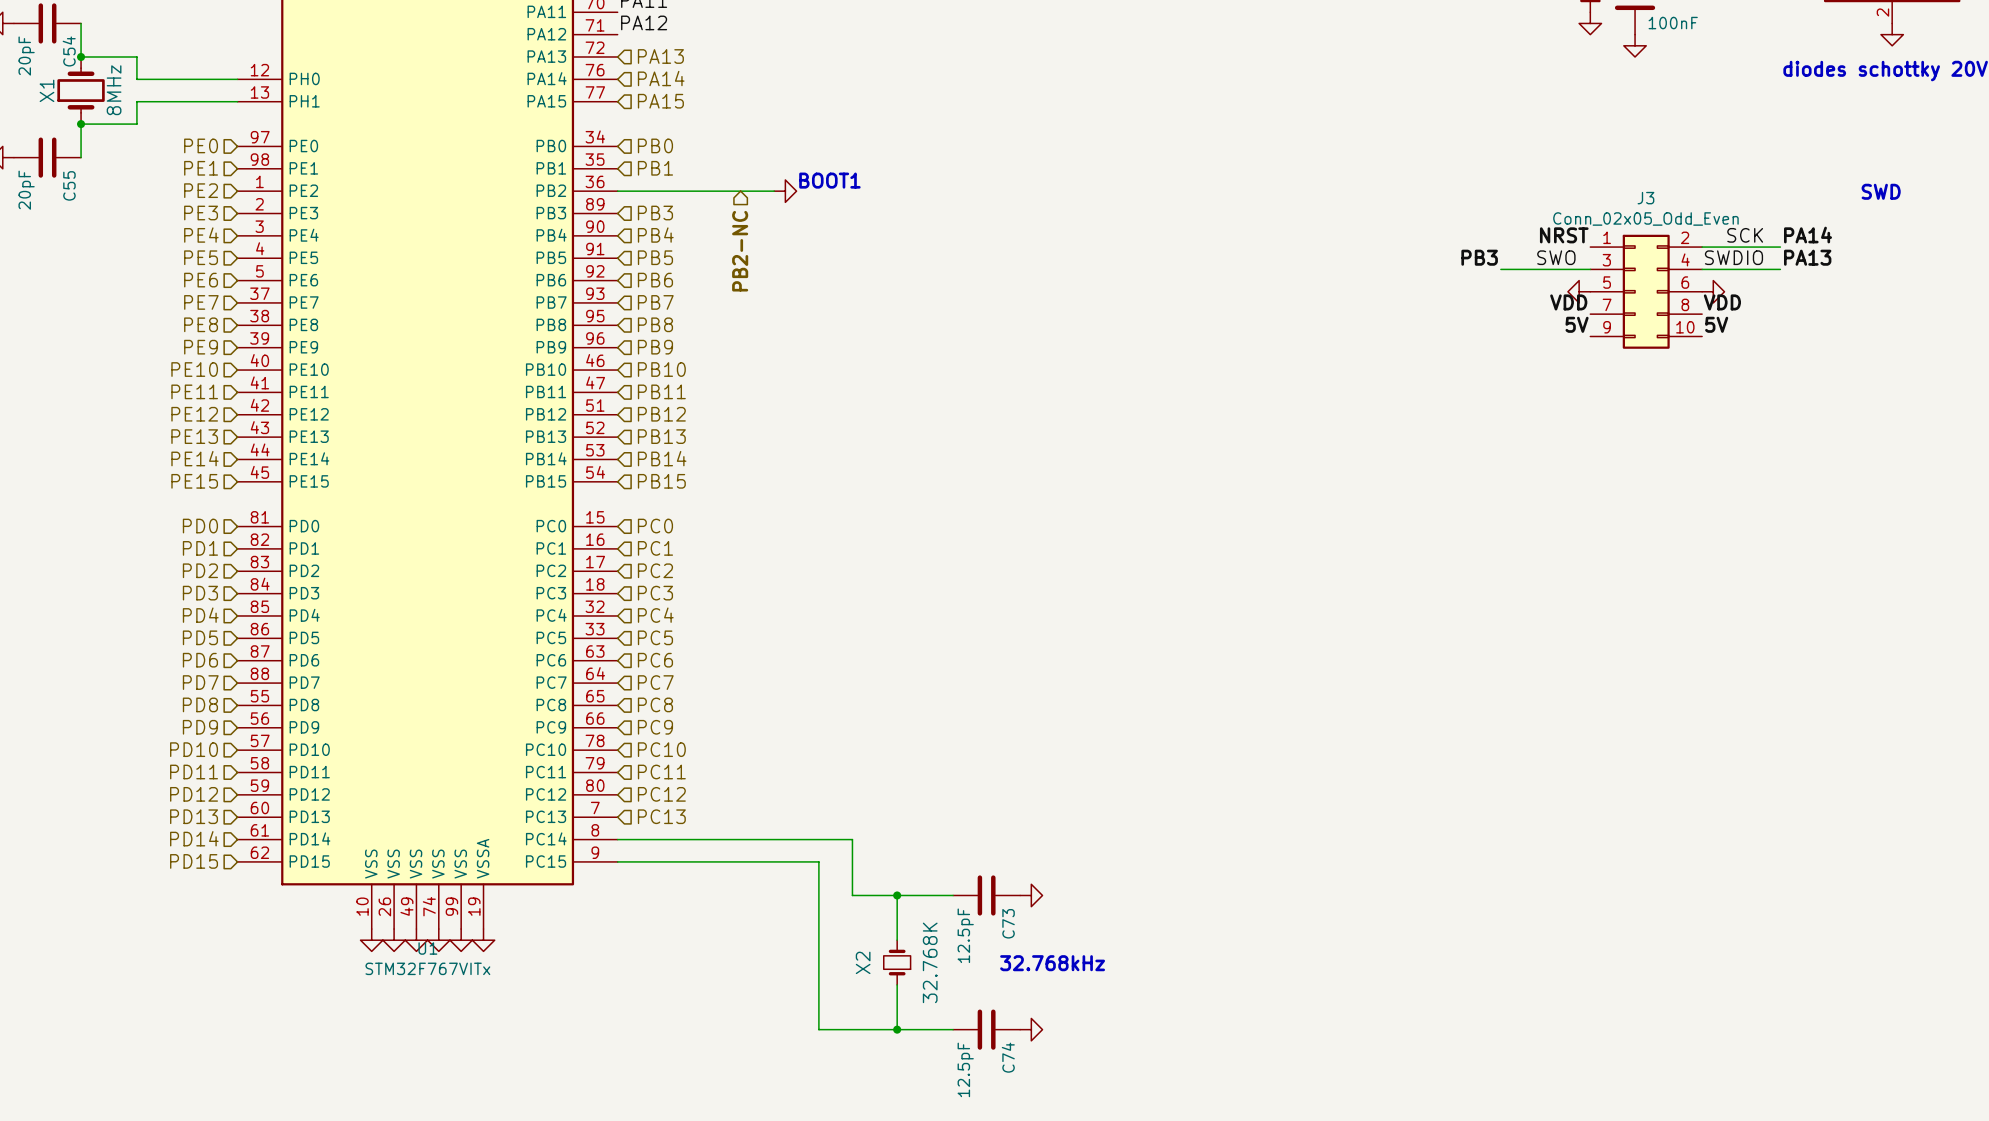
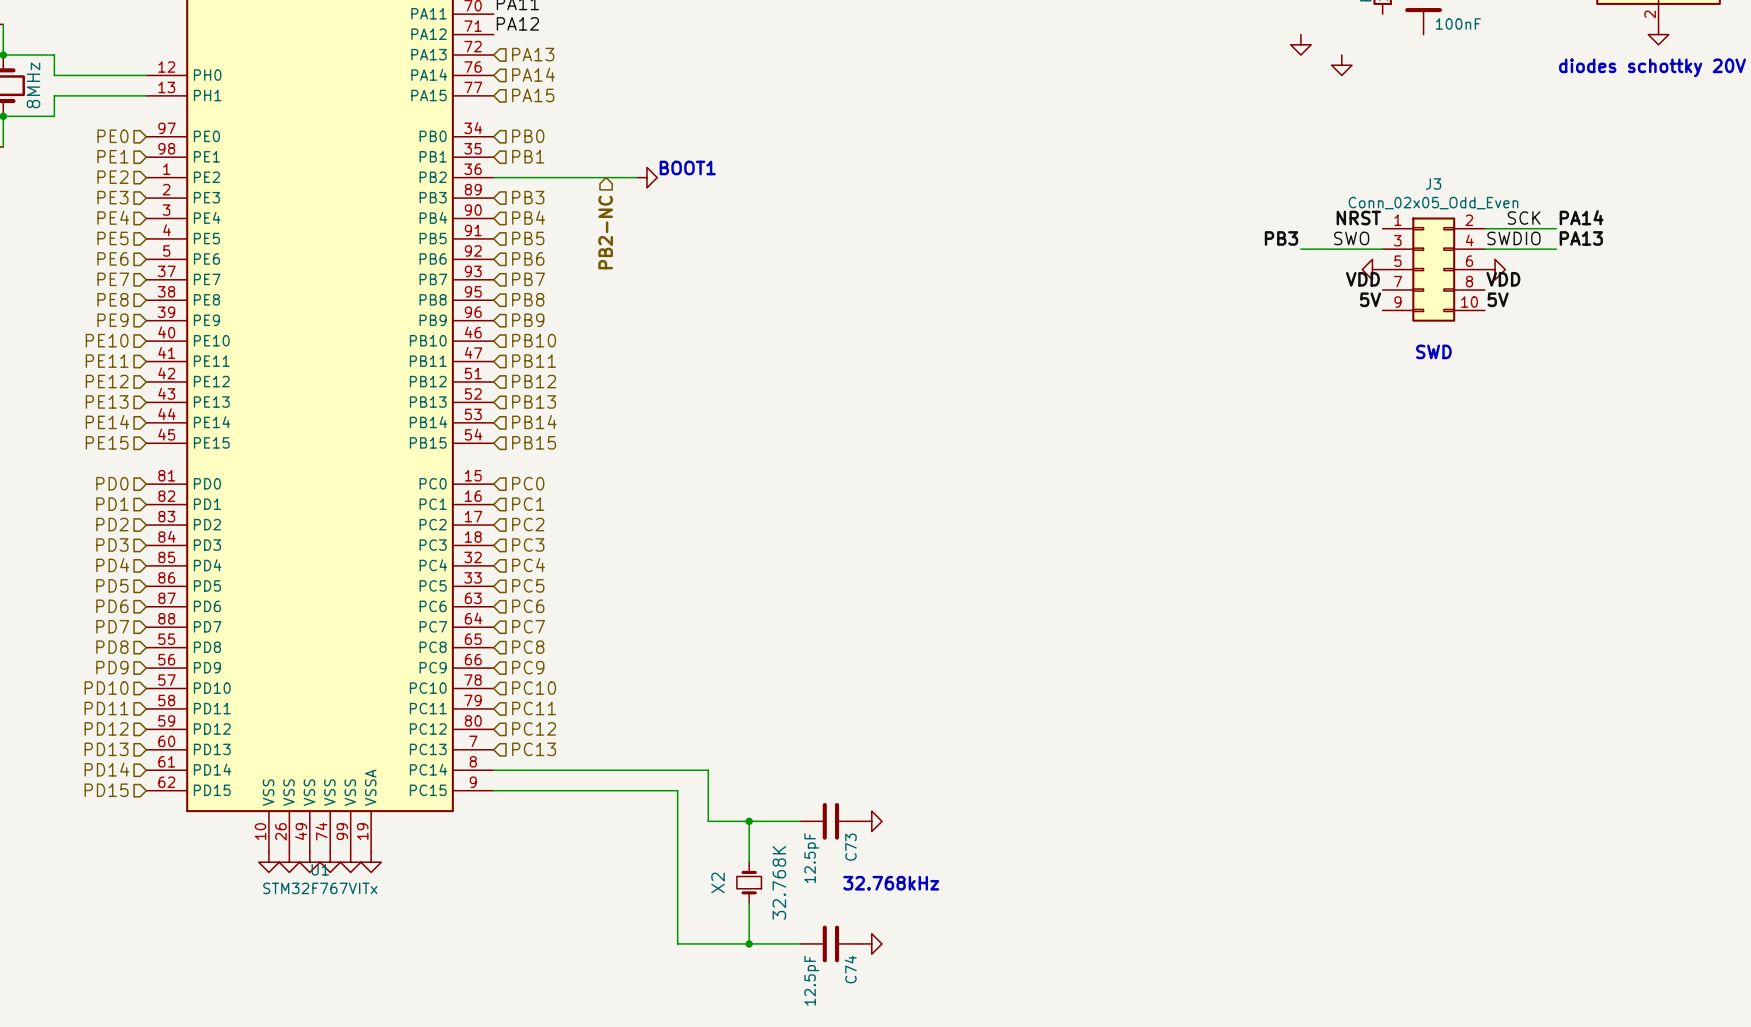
power symbol: (1590, 23) -> none
power symbol: none -> (1300, 44)
power symbol: (1635, 45) -> none
power symbol: none -> (1341, 65)
text: SWD (1881, 191) -> none
text: none -> SWD (1433, 351)

